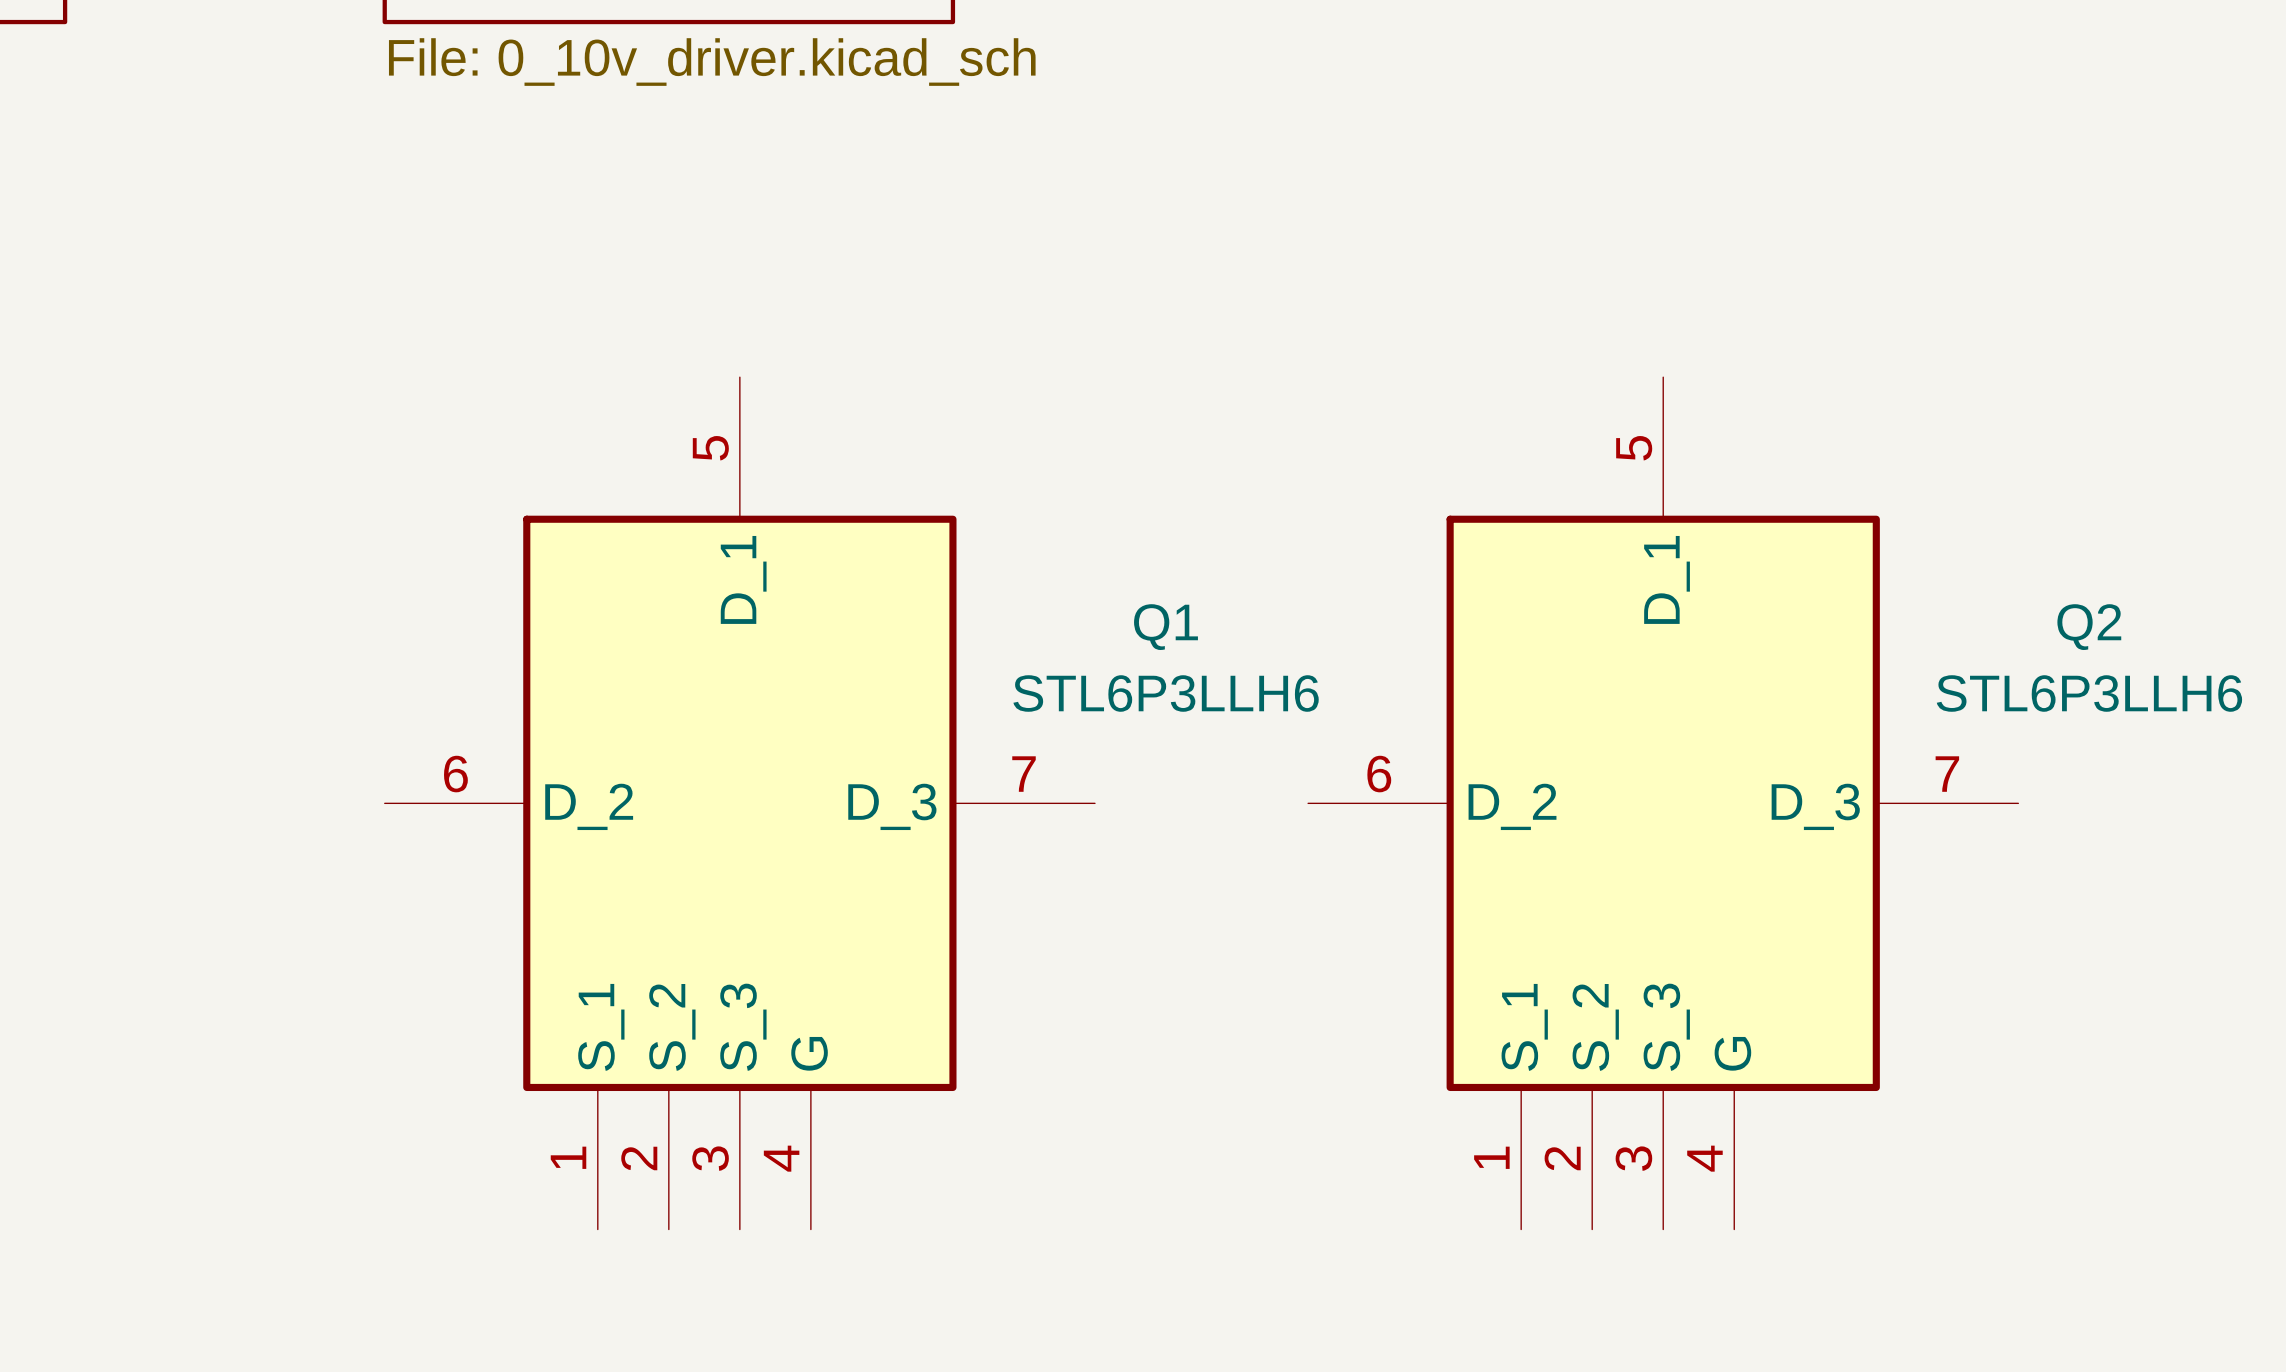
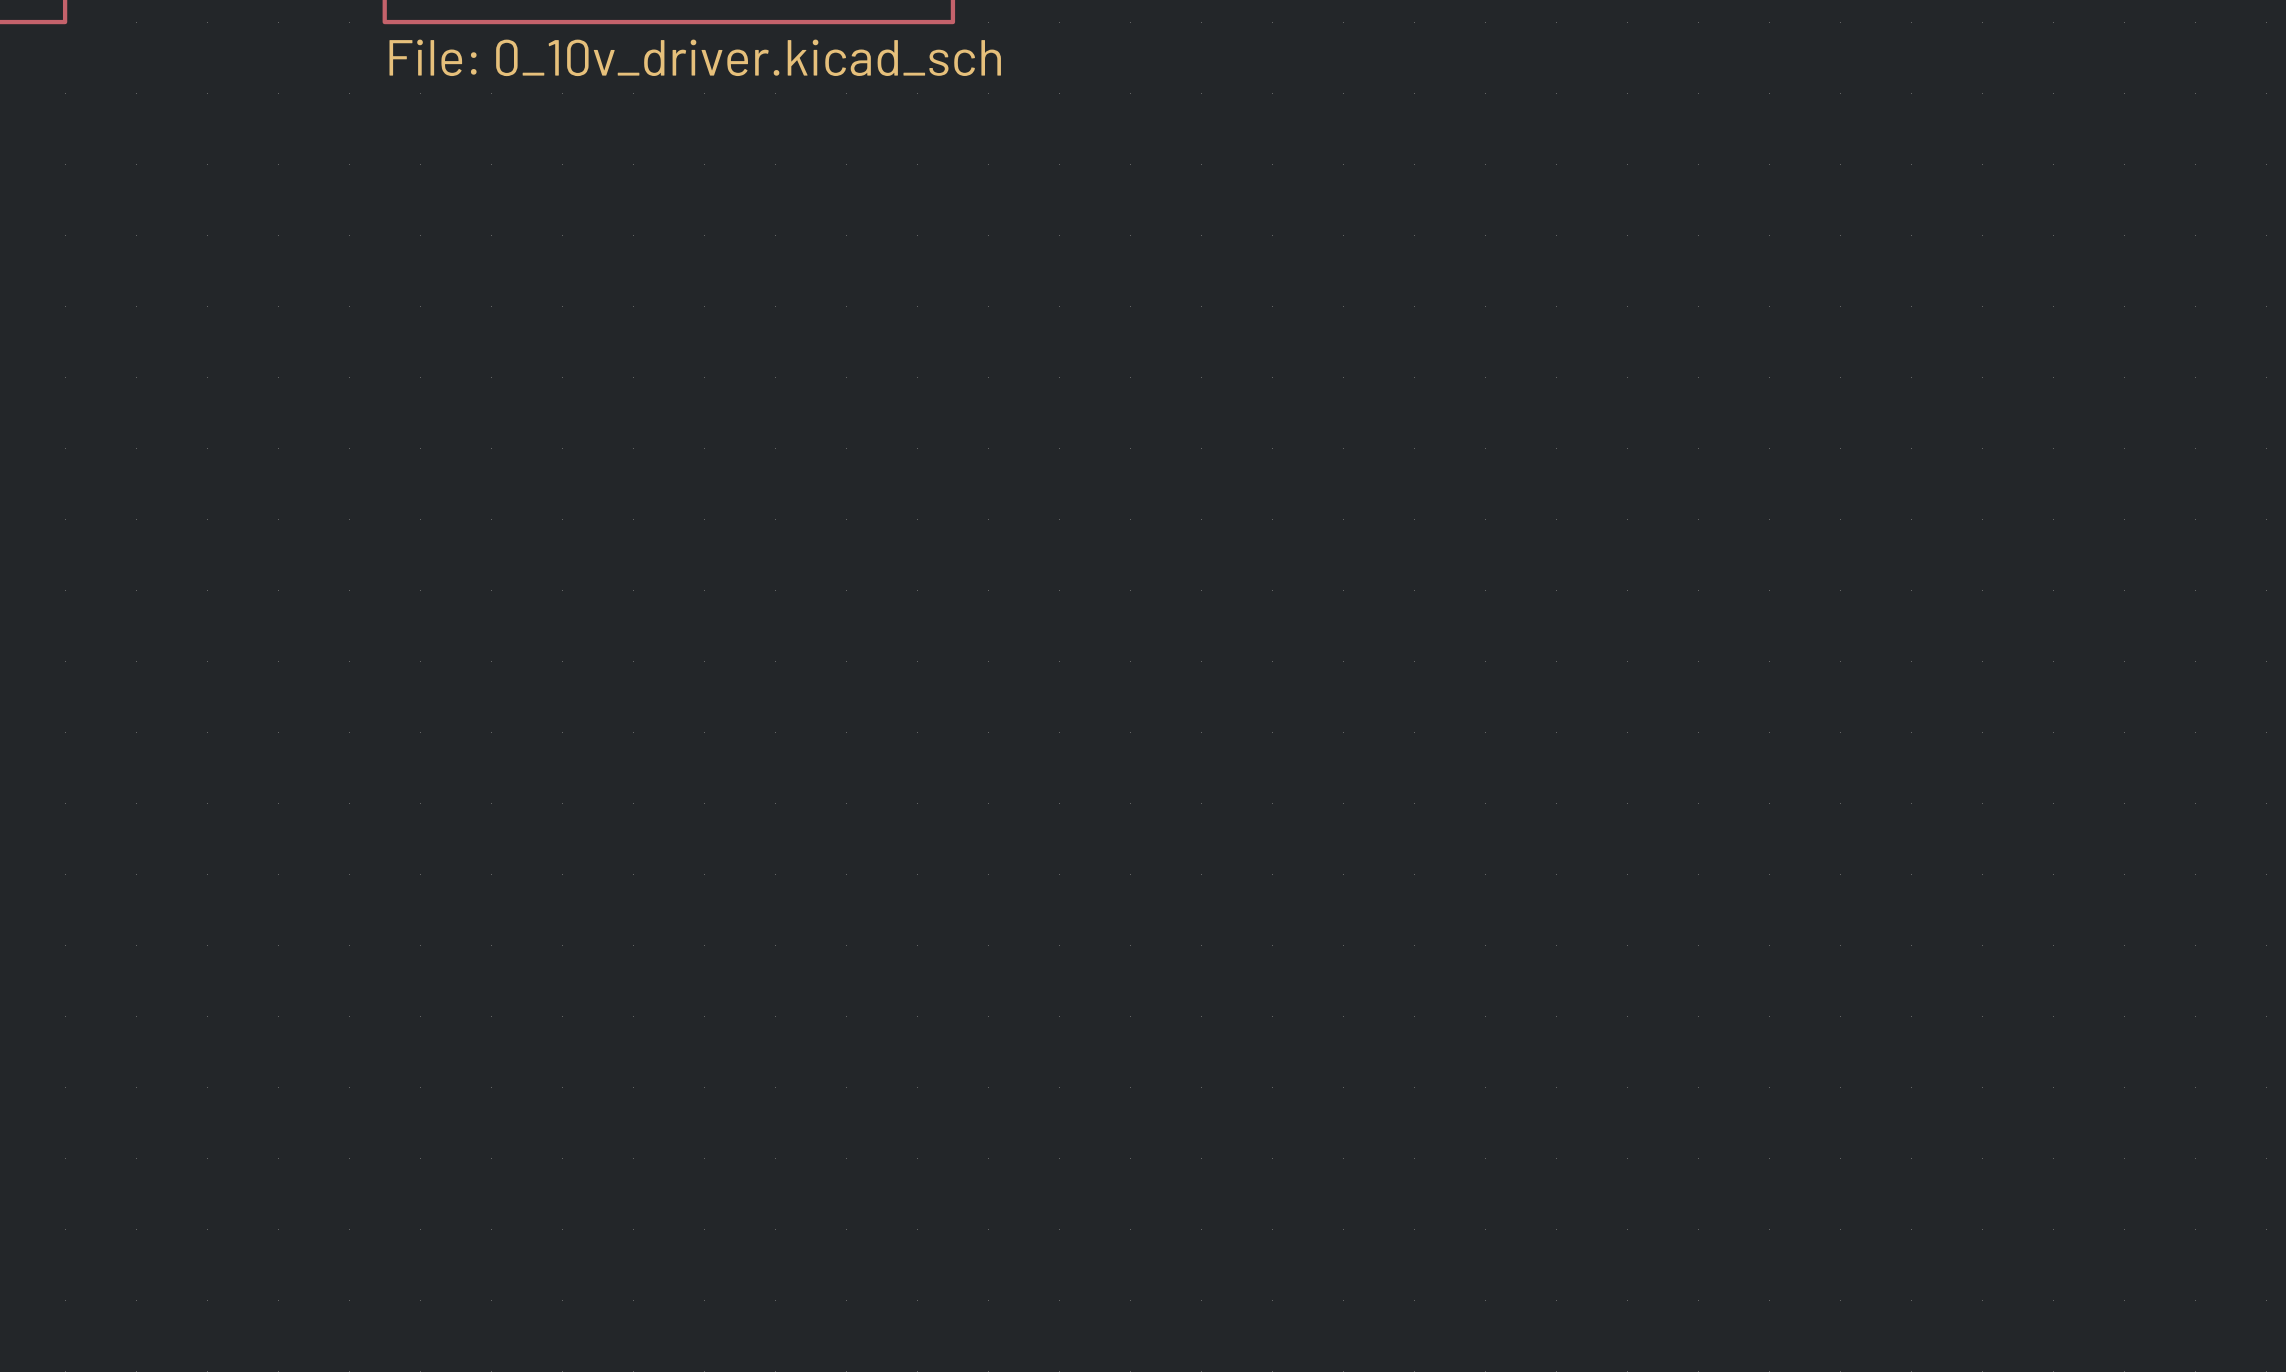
Q1: STL6P3LLH6 (739, 803) -> none
Q2: STL6P3LLH6 (1663, 803) -> none

